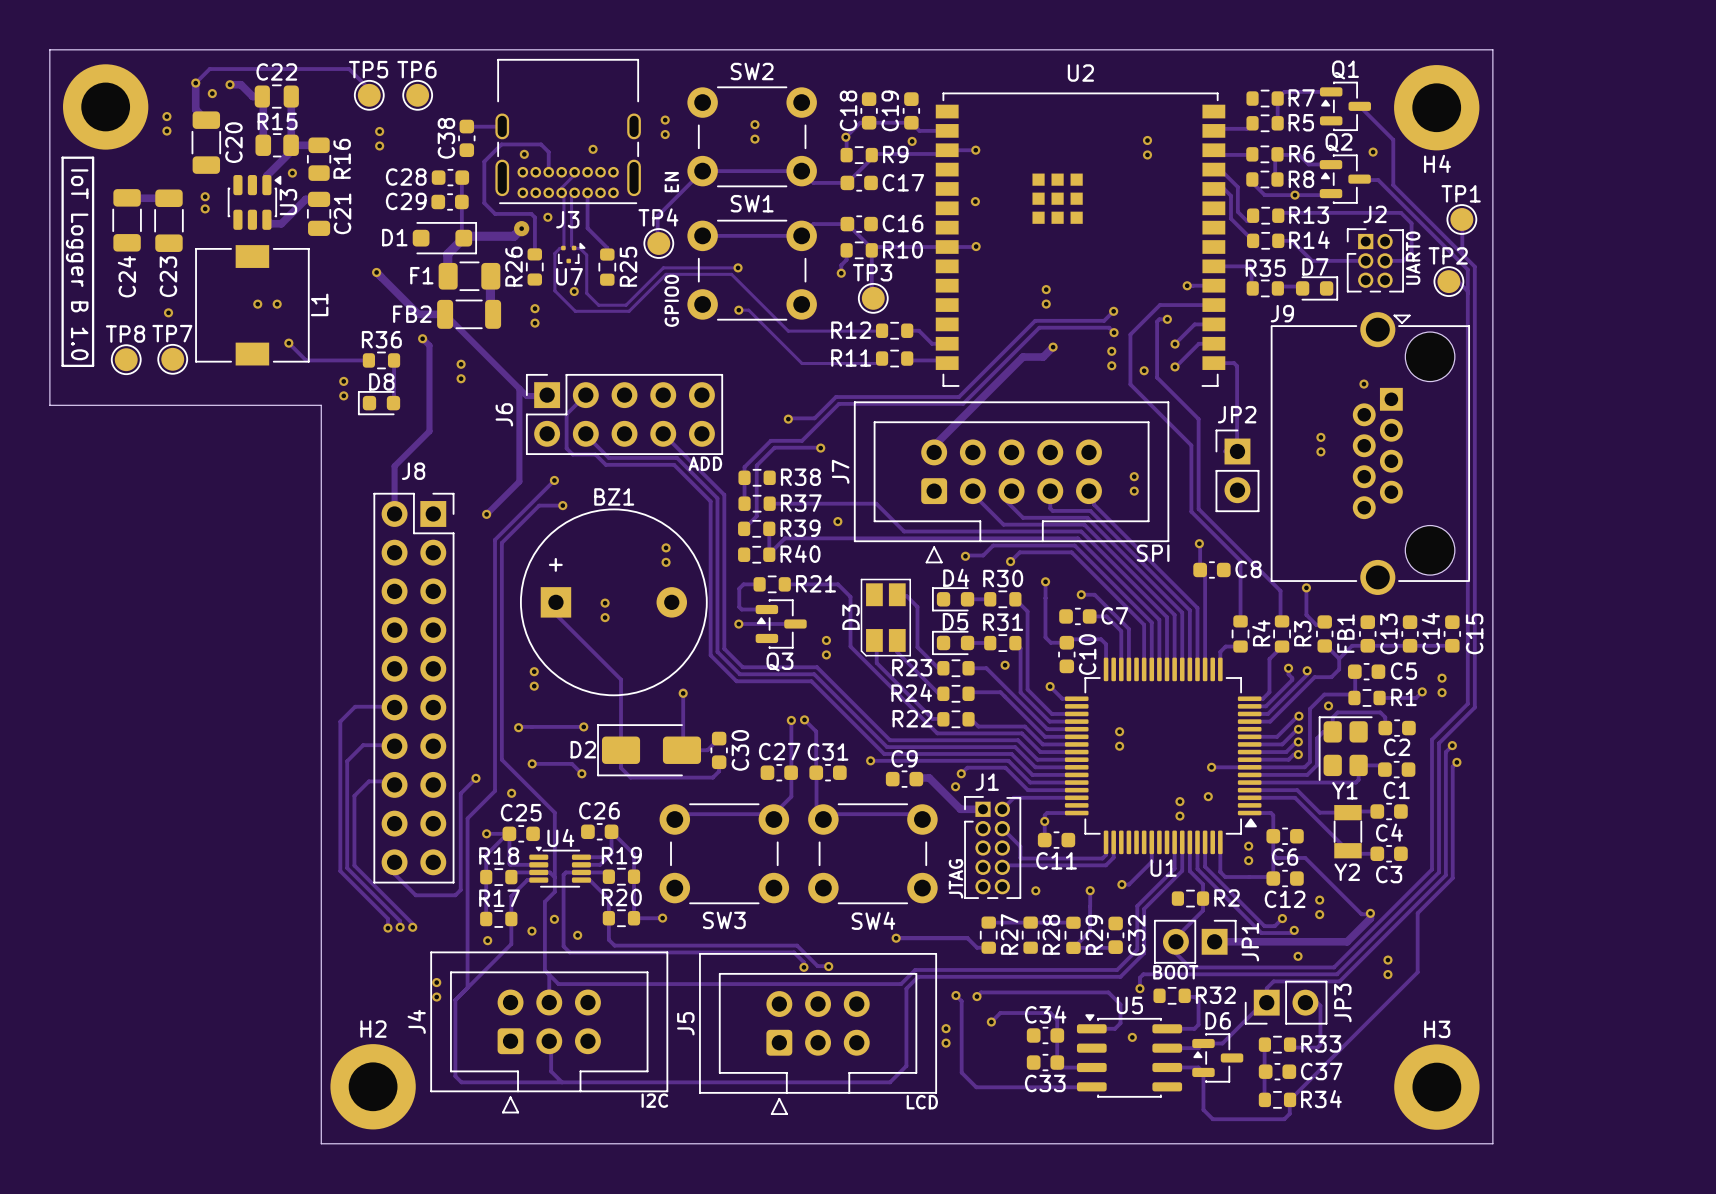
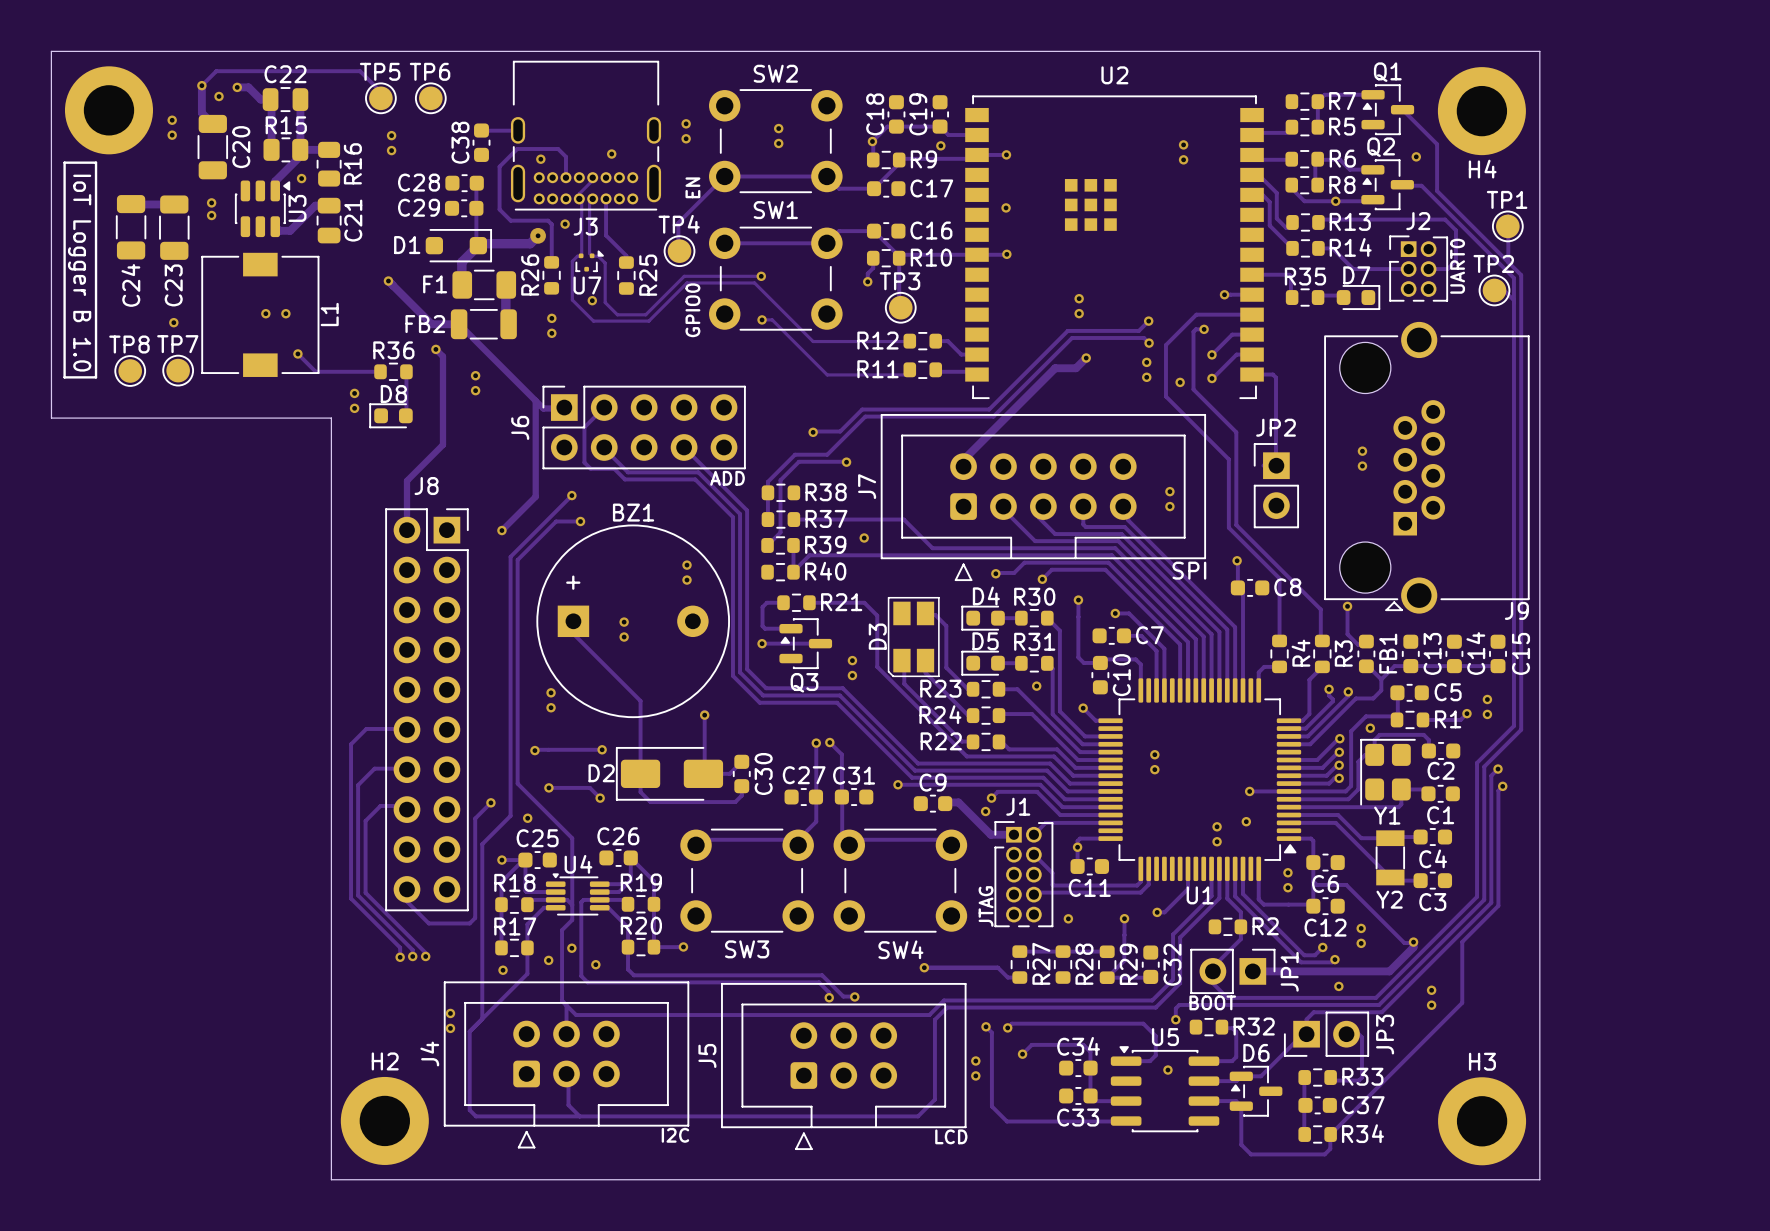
via: (1363, 384) -> none
J9 rotation: 0° (1370, 453) -> 180° (1426, 467)

